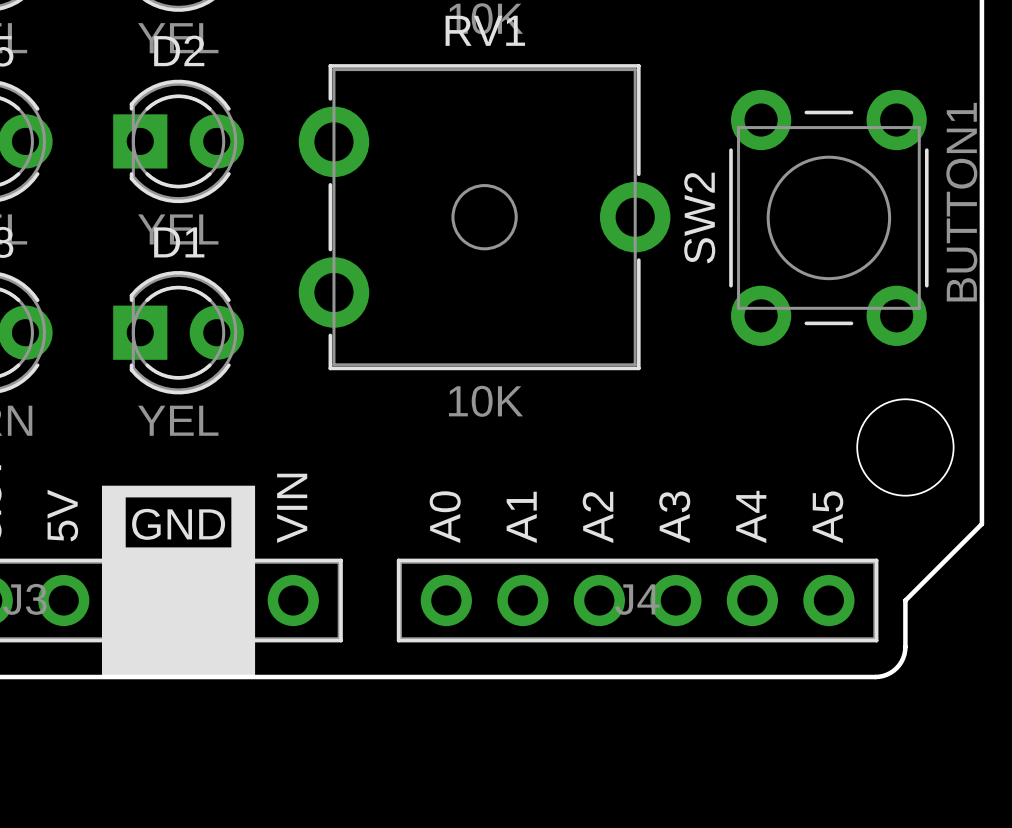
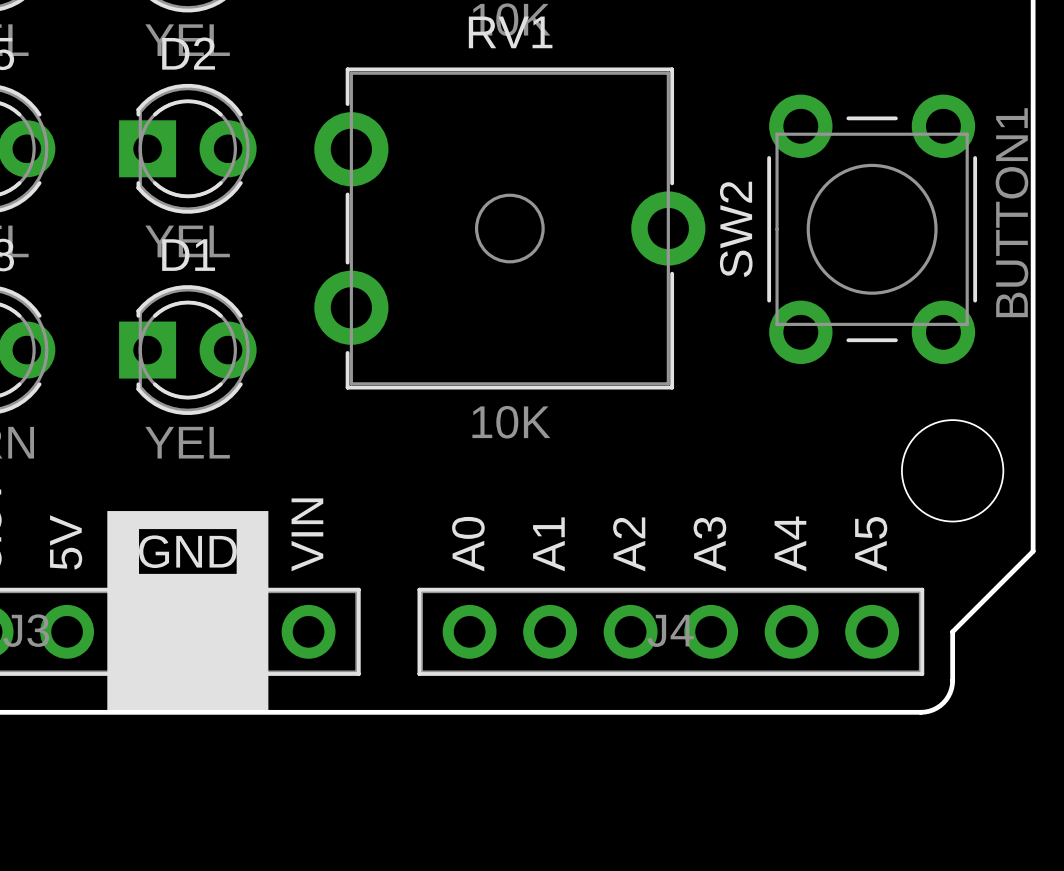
drawing shape: [101, 485, 256, 678] -> [107, 511, 269, 713]

